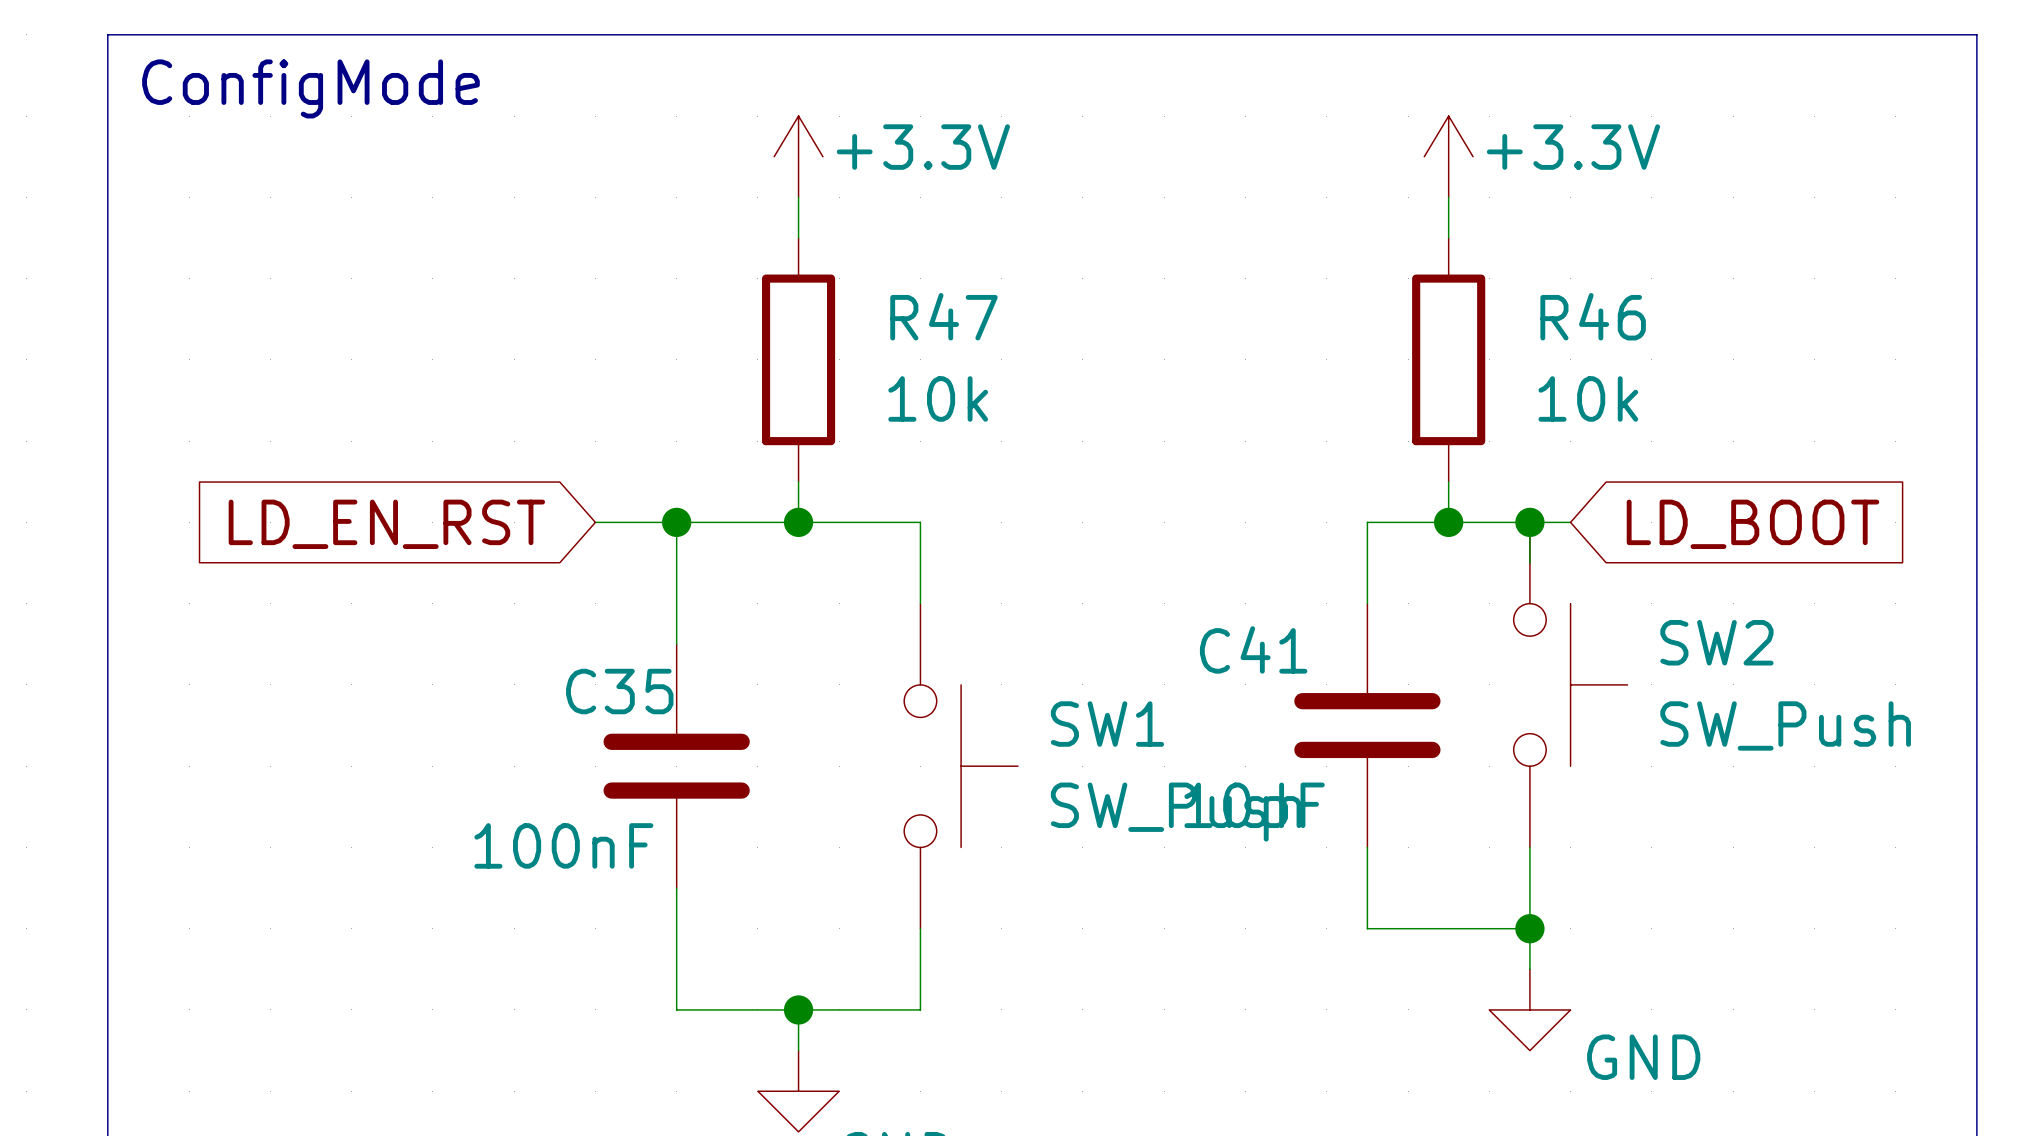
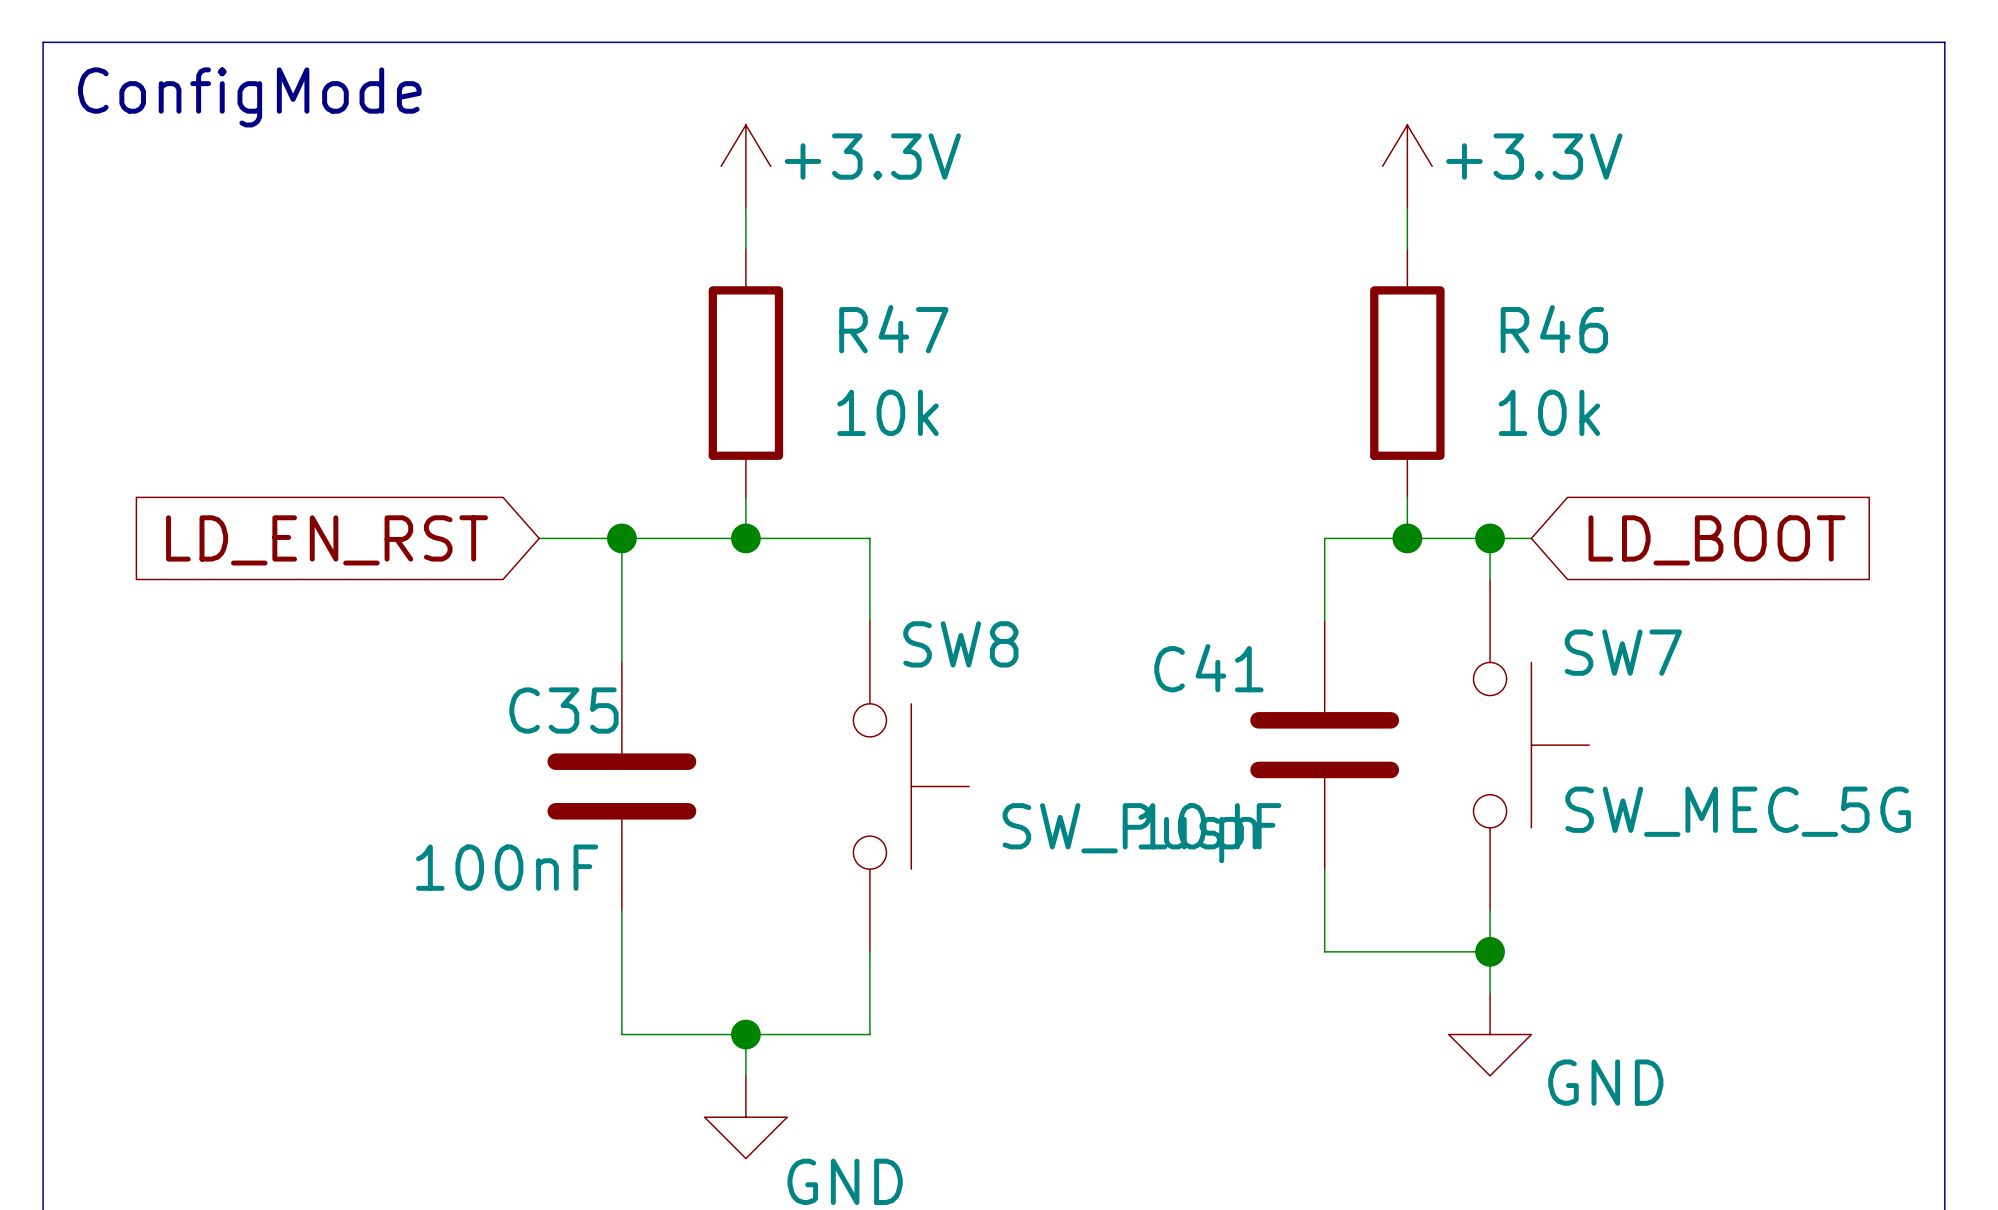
SW2: SW_Push (1570, 684) -> none
SW1 name: SW1 (1107, 724) -> SW8 (960, 644)
SW7: none -> SW_MEC_5G (1531, 745)

